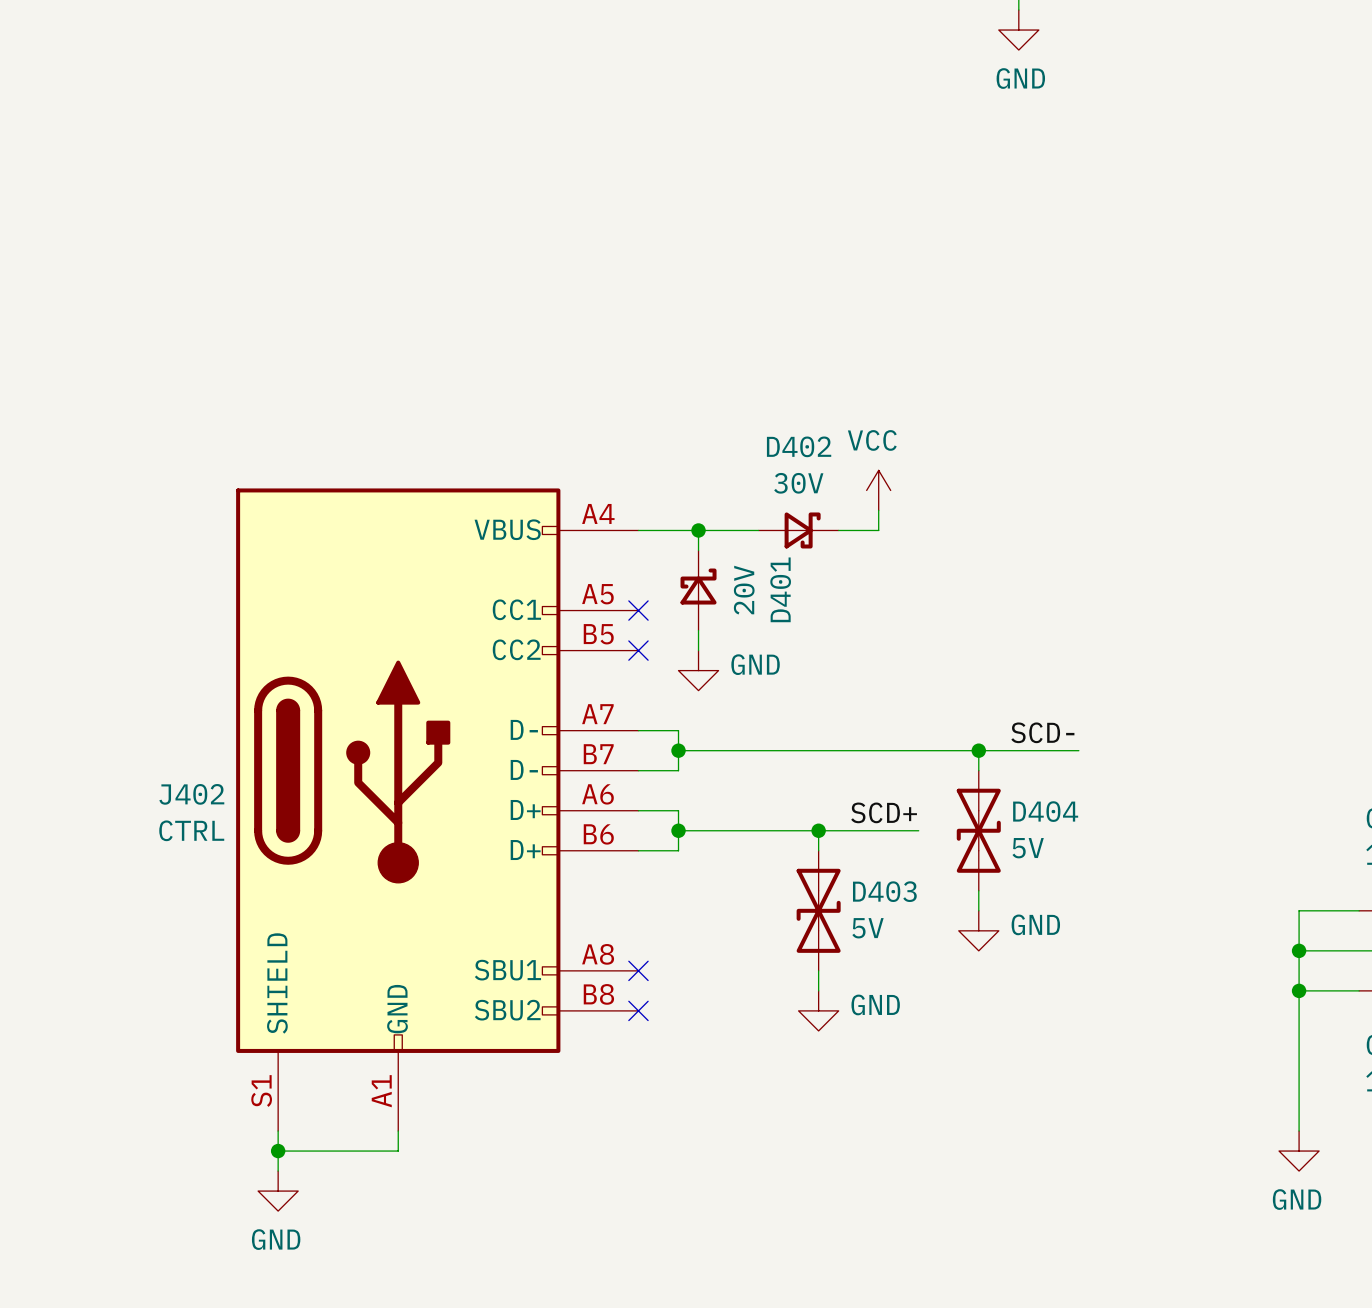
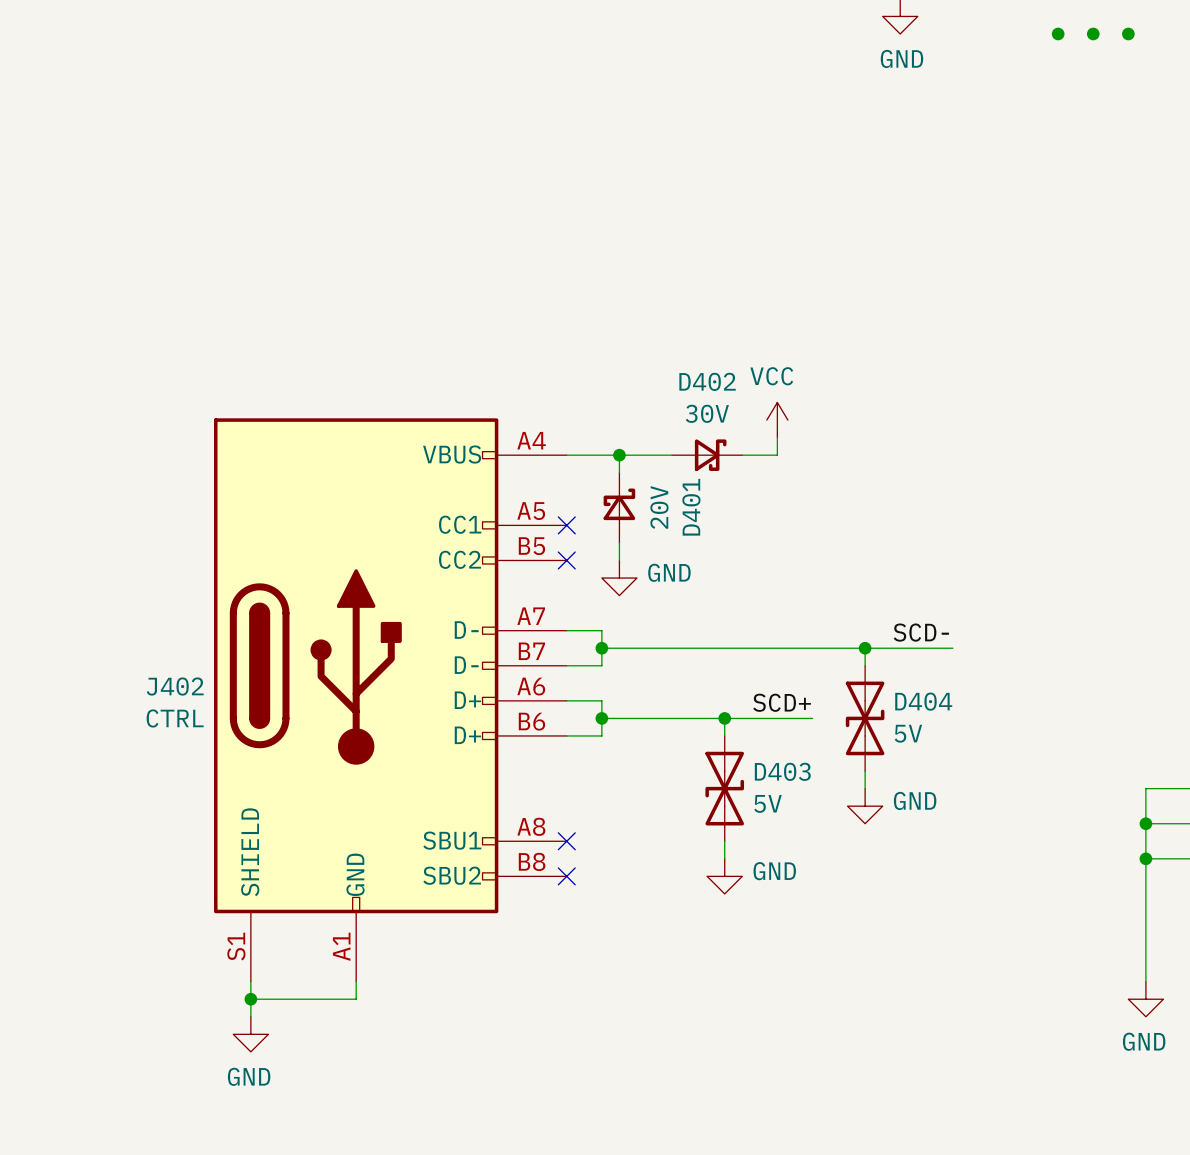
junction: none -> (1058, 33)
junction: none -> (1093, 33)
junction: none -> (1128, 33)

